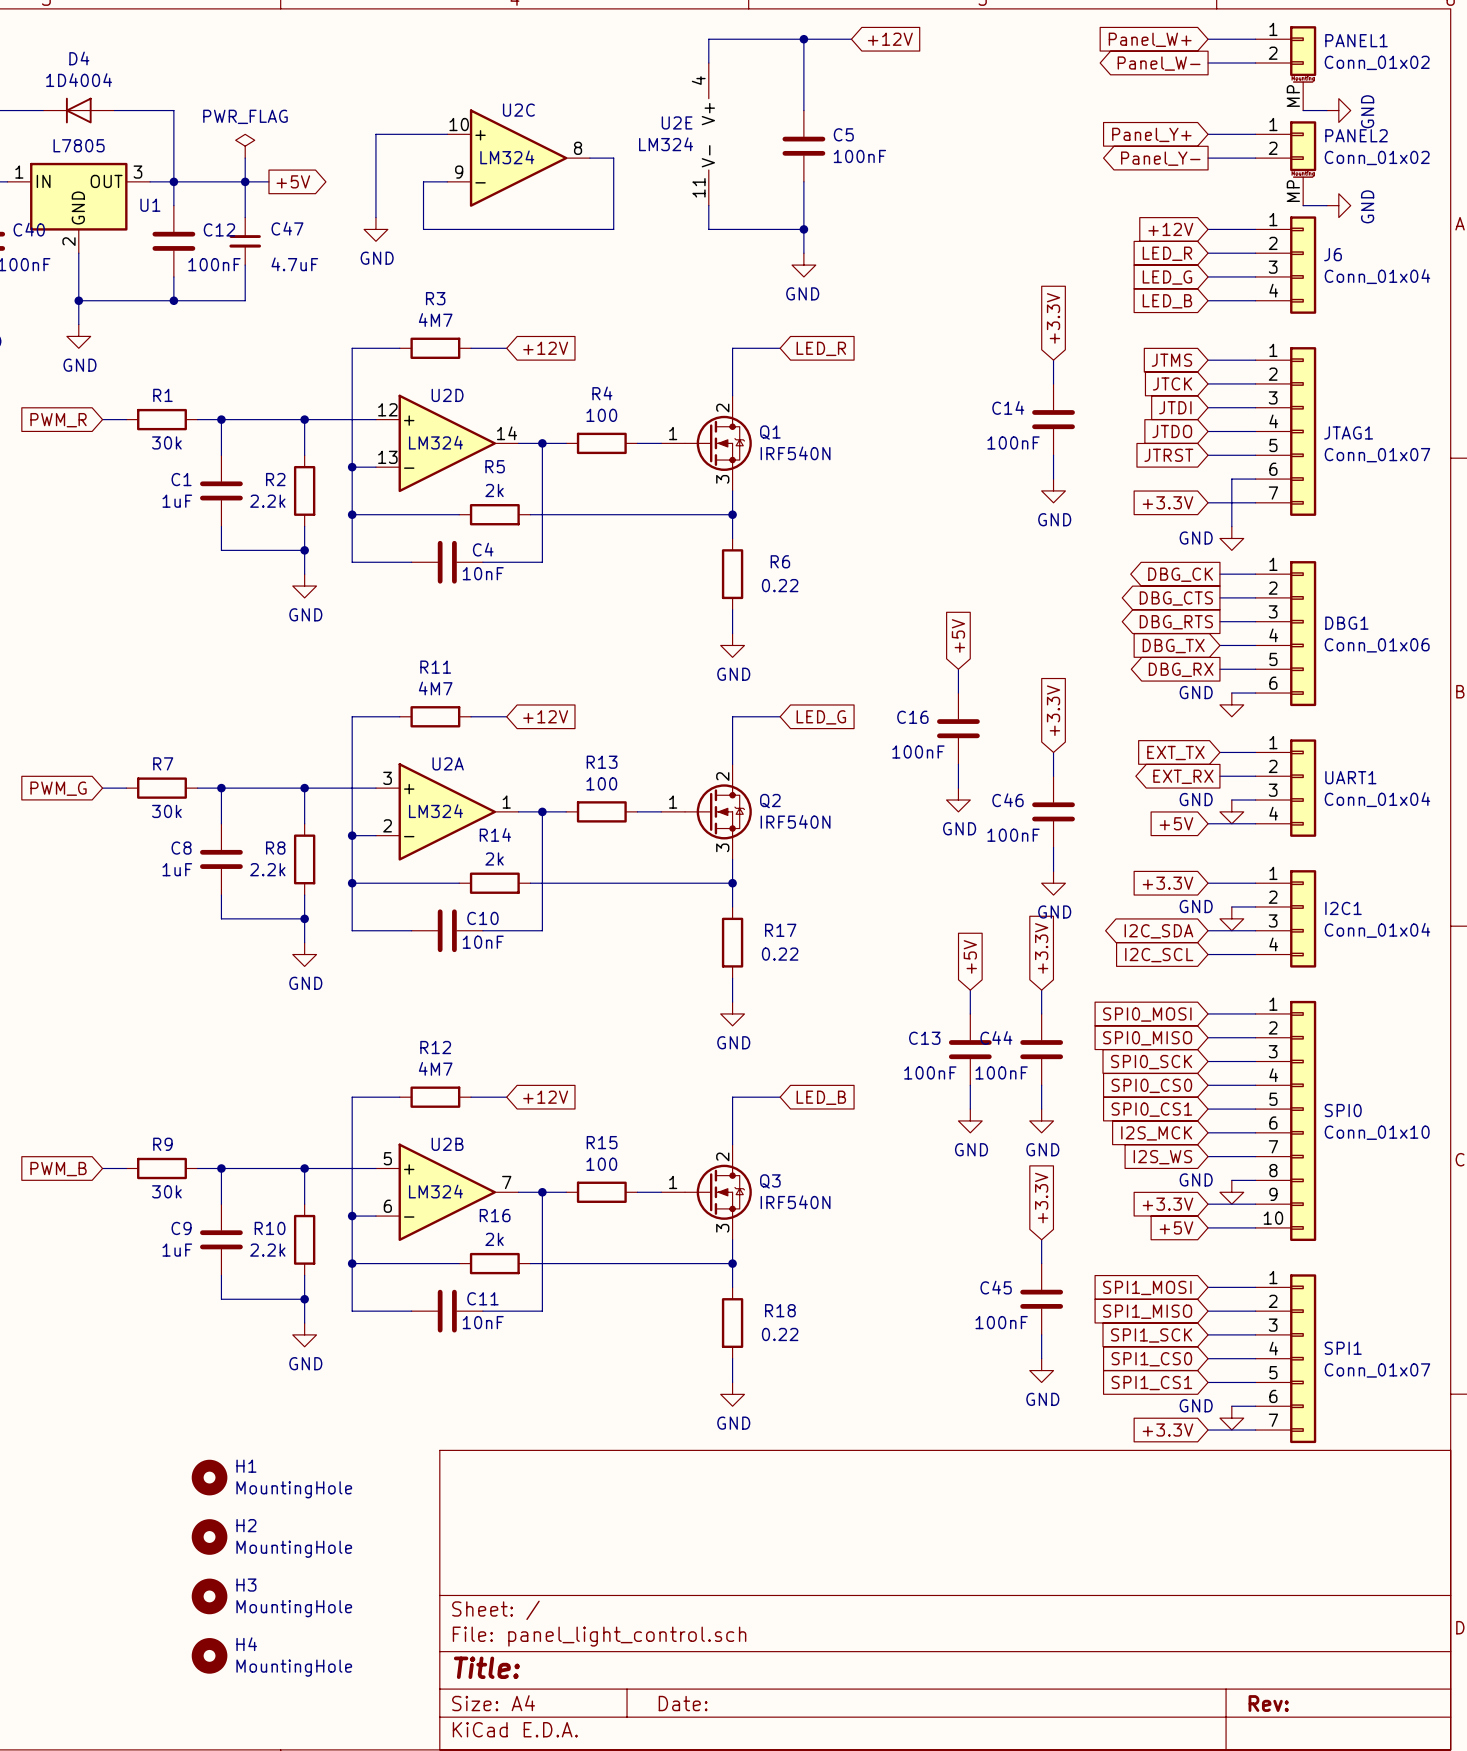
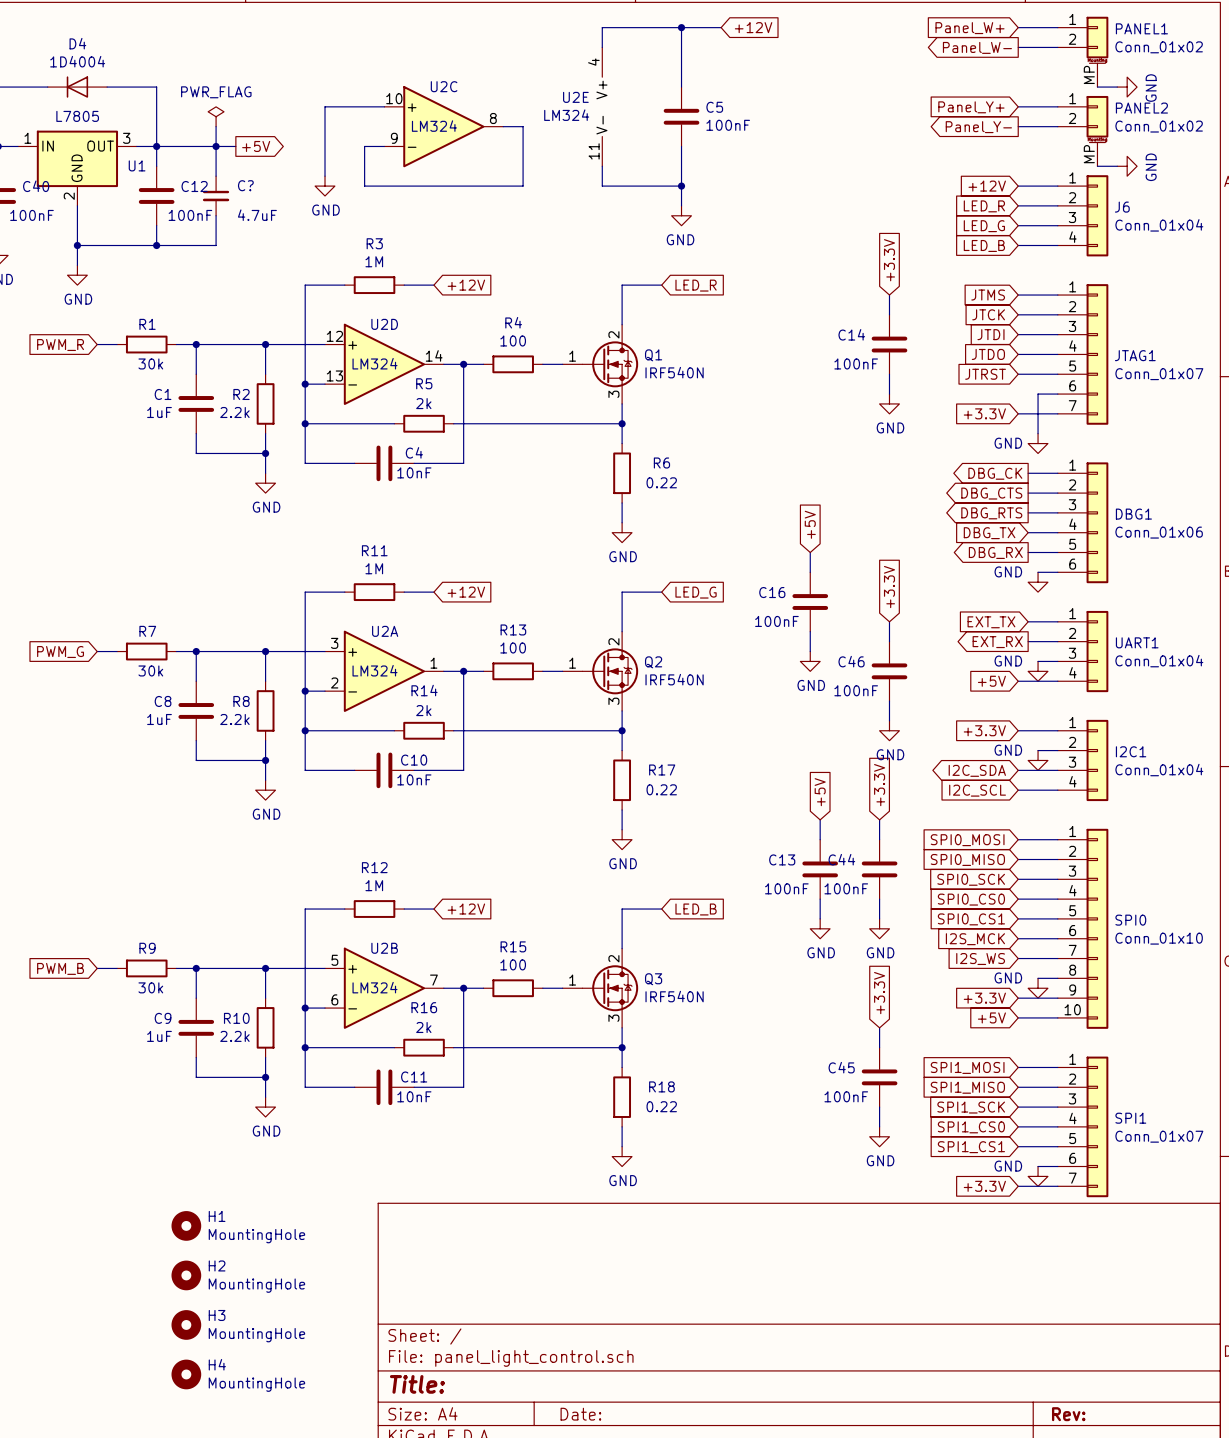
C47 name: C47 (287, 228) -> C? (245, 185)
R3 value: 4M7 (435, 319) -> 1M (374, 261)
R11 value: 4M7 (435, 688) -> 1M (374, 568)
R12 value: 4M7 (435, 1068) -> 1M (374, 885)

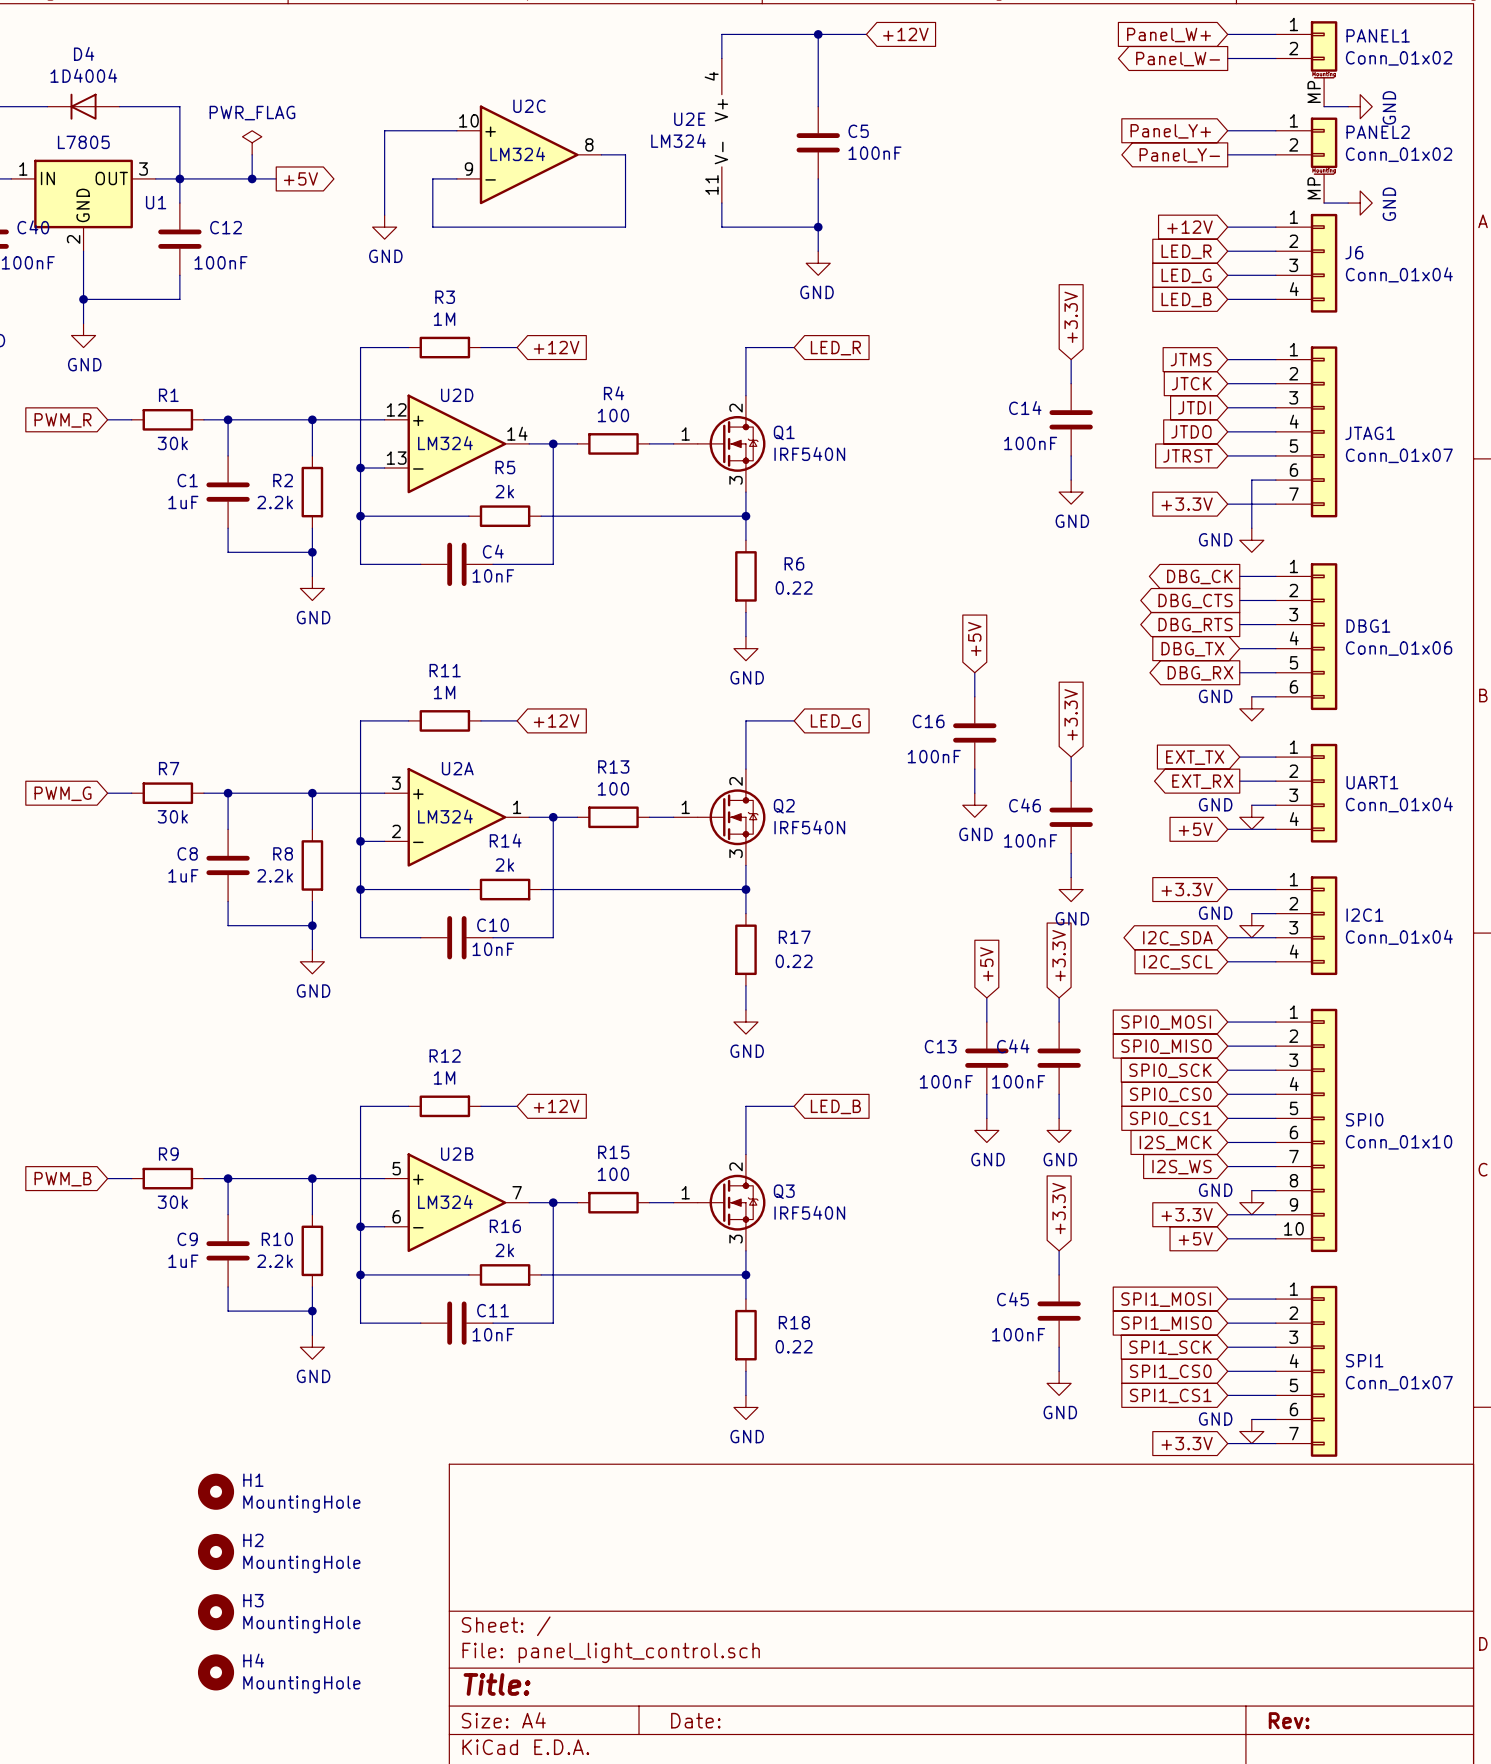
wire: (216, 146) (216, 176) -> none
C?: 4.7uF (216, 195) -> none
wire: (216, 215) (216, 245) (156, 245) -> none
junction: (156, 245) -> none

